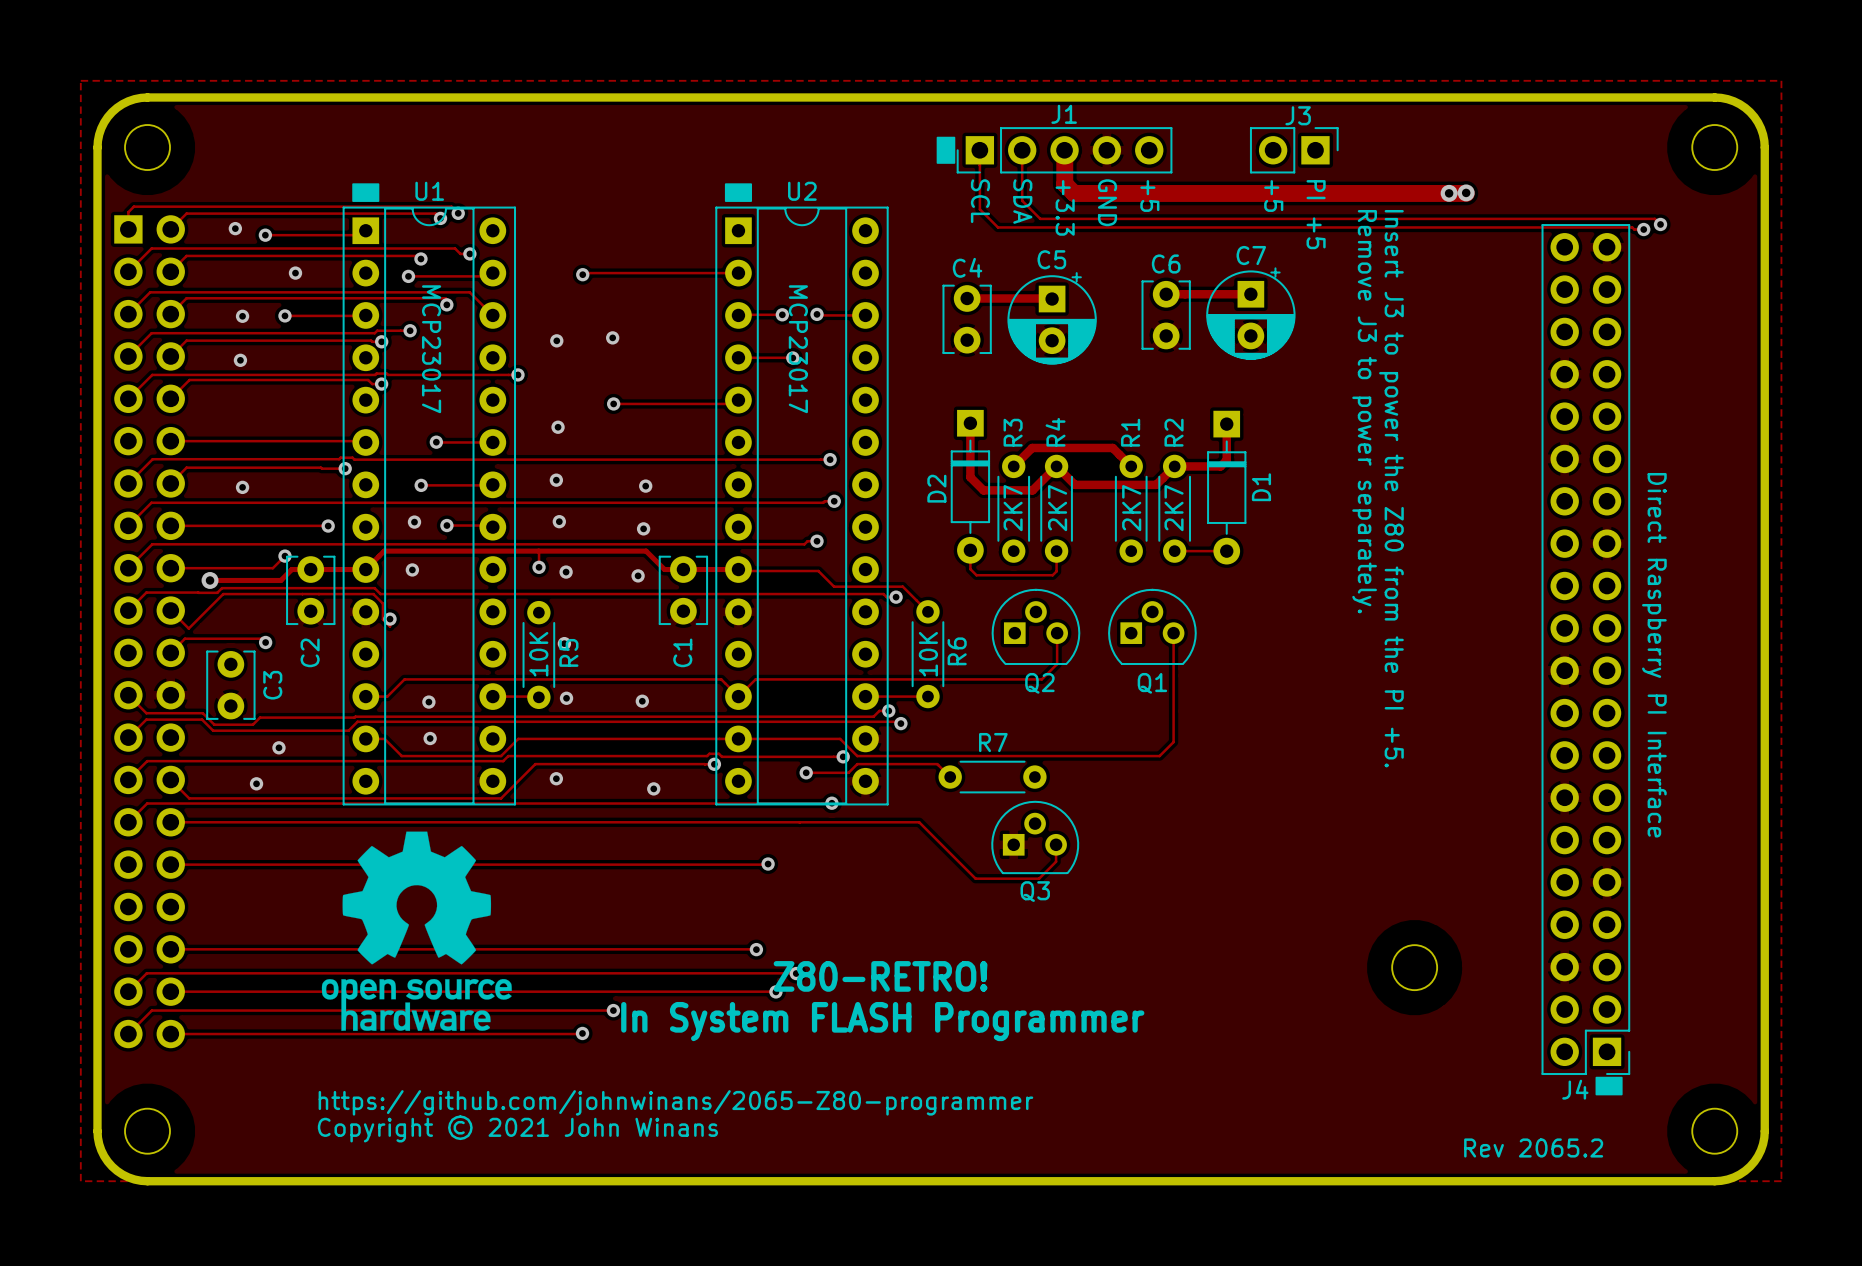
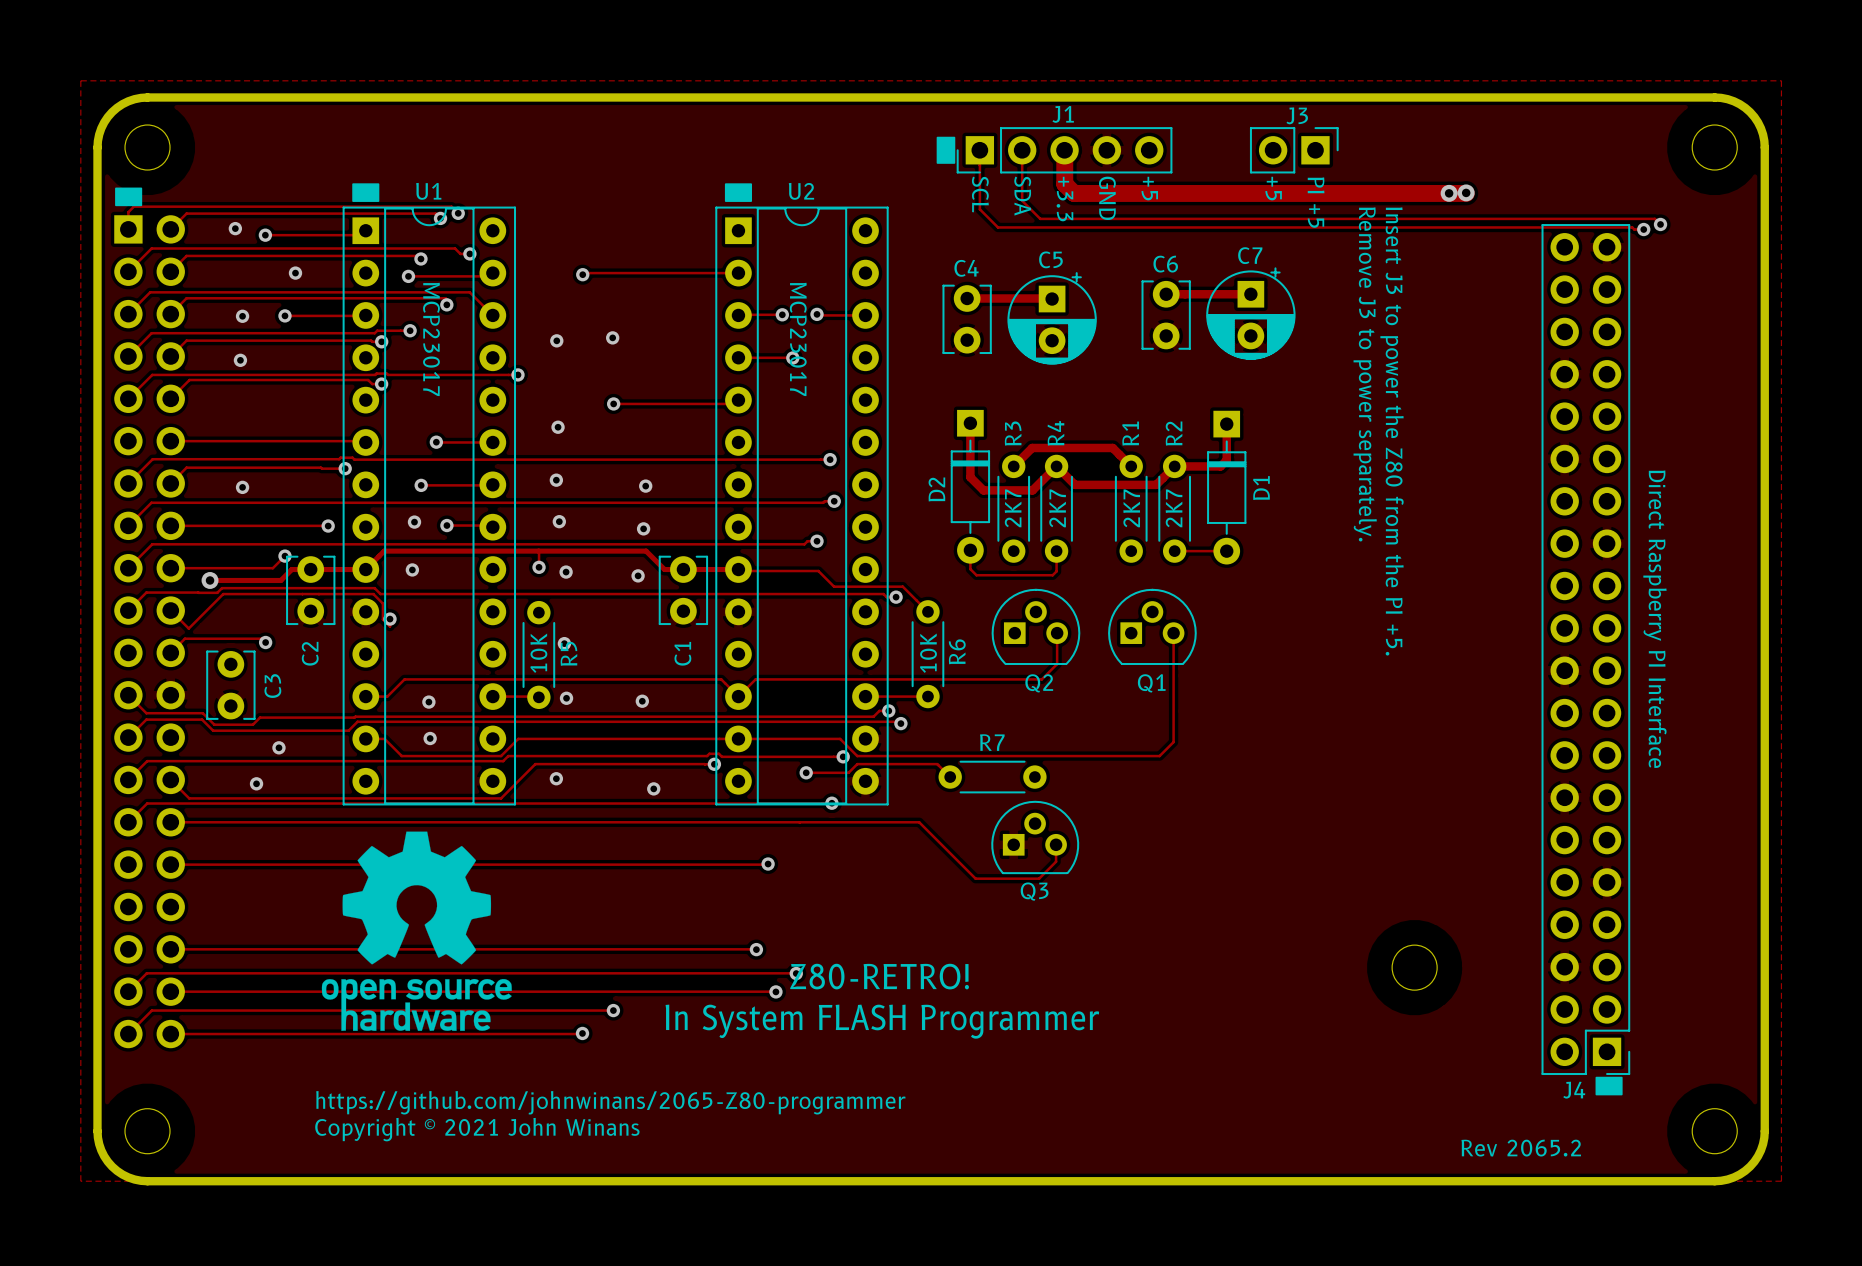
drawing: none -> [115, 187, 143, 207]

